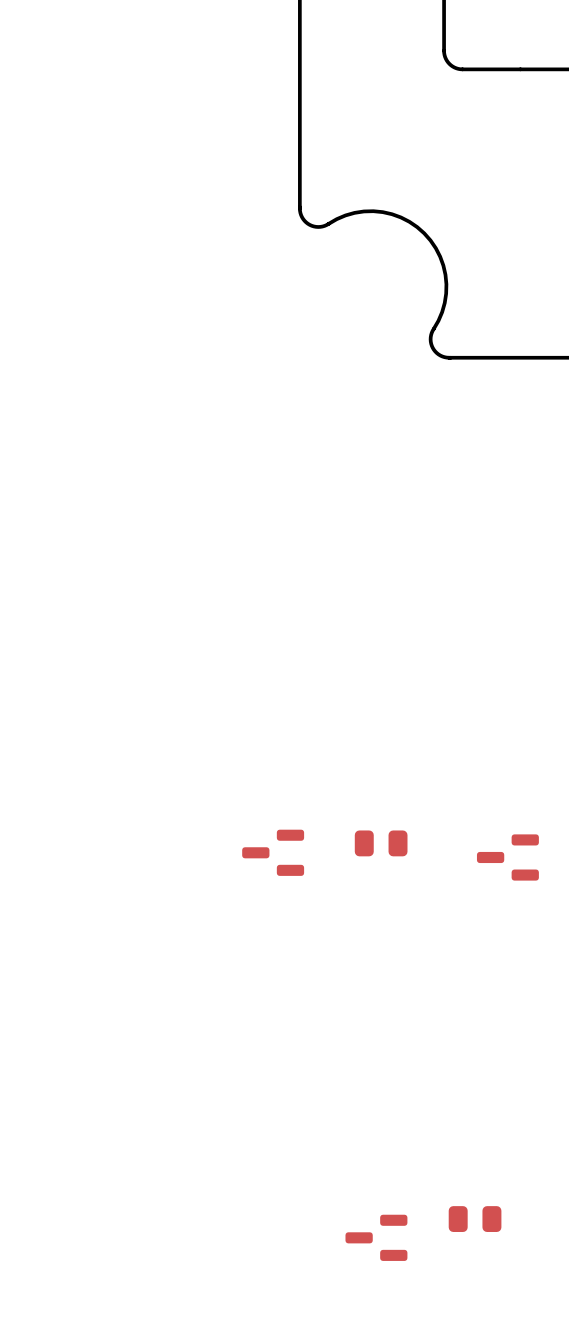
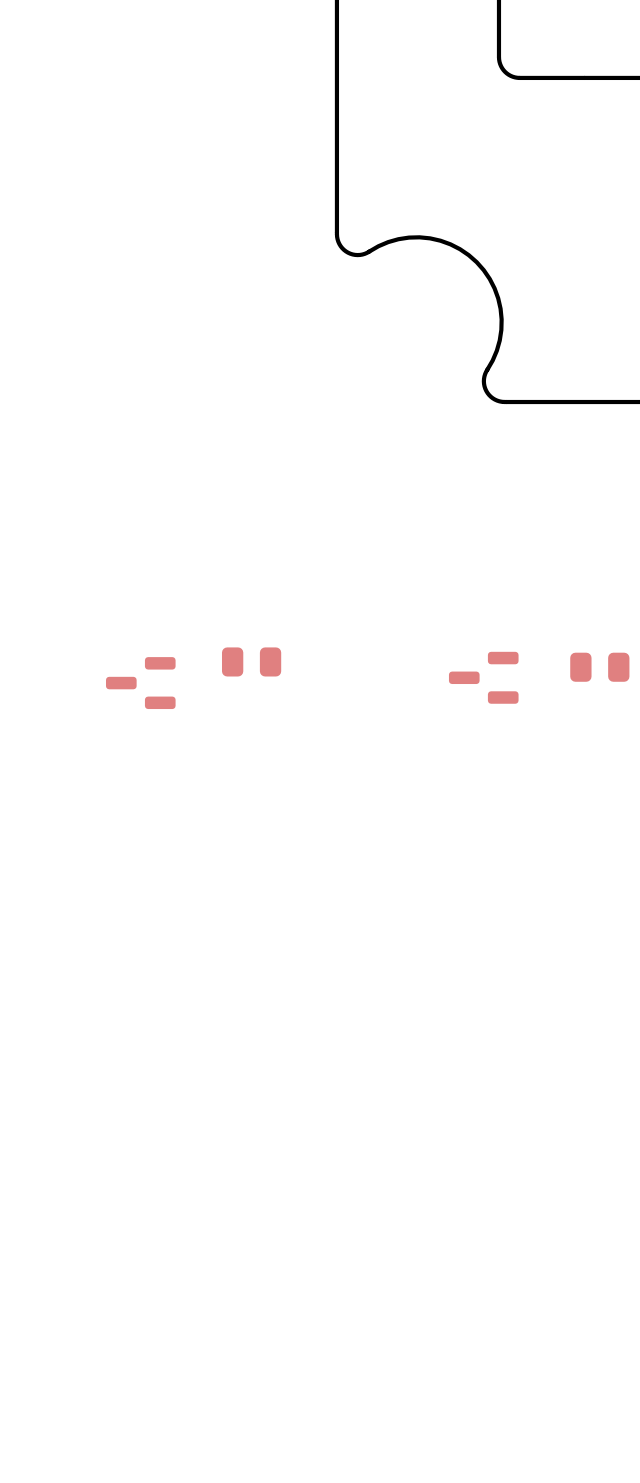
part: none -> (251, 661)
part: none -> (599, 667)
part: none -> (483, 677)
part: none -> (140, 683)
part: (381, 843) -> none
part: (273, 852) -> none
part: (507, 857) -> none
part: (475, 1219) -> none
part: (376, 1237) -> none

